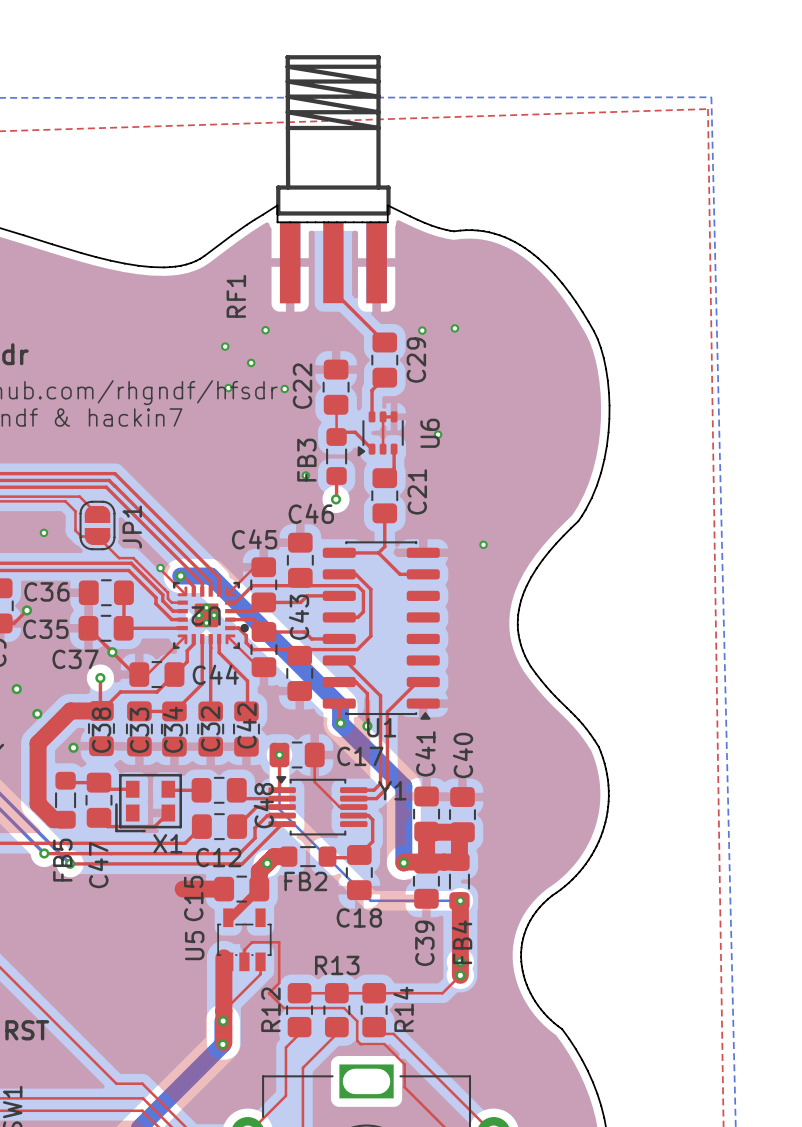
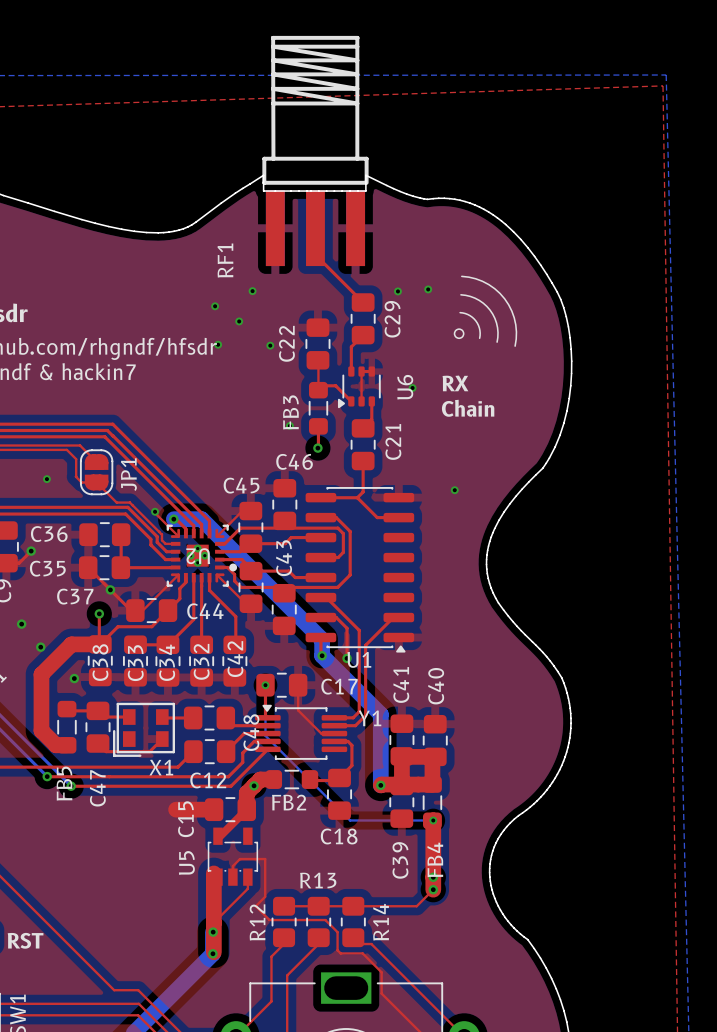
line: none -> (461, 276) (482, 281) (494, 288) (504, 298) (511, 311) (515, 324) (515, 346)
line: none -> (460, 294) (474, 298) (490, 310) (497, 327) (497, 342)
line: none -> (460, 312) (470, 315) (475, 320) (479, 330) (479, 338)
drawing: none -> [453, 328, 465, 340]
text: none -> RX (455, 383)
text: none -> Chain (468, 408)

